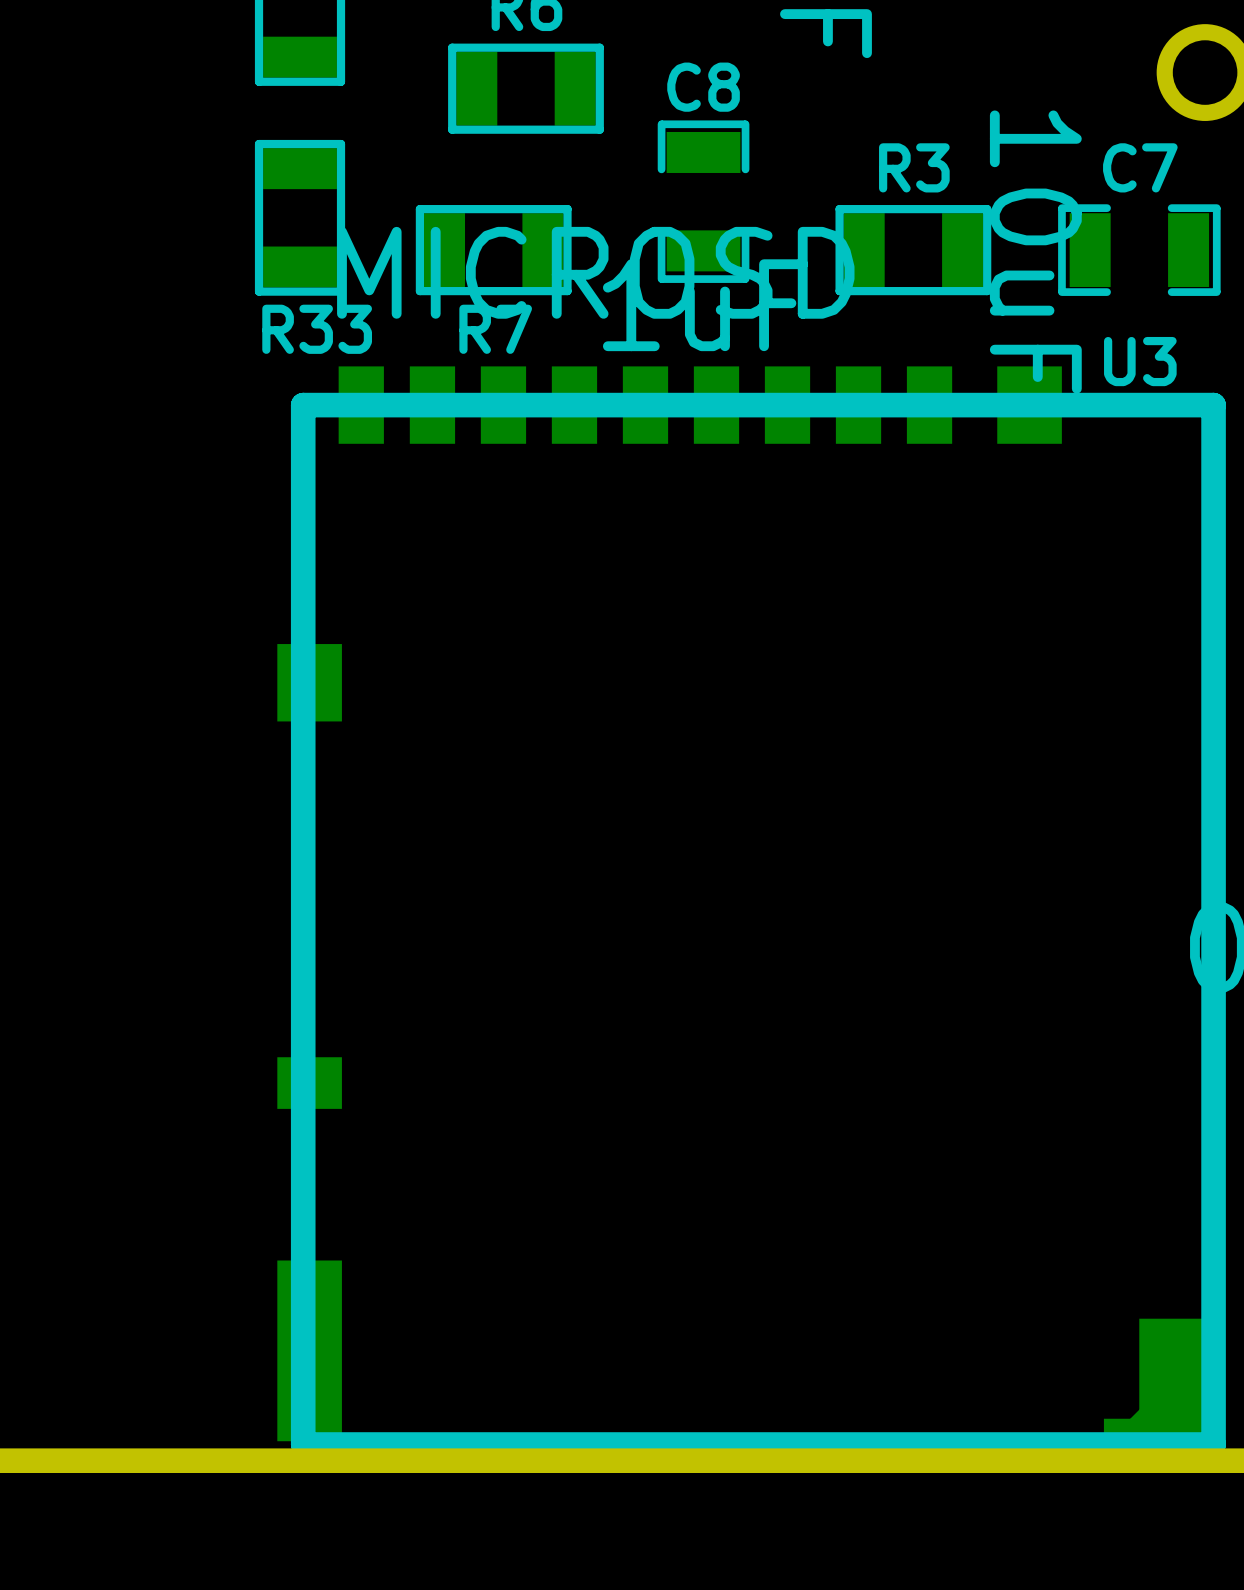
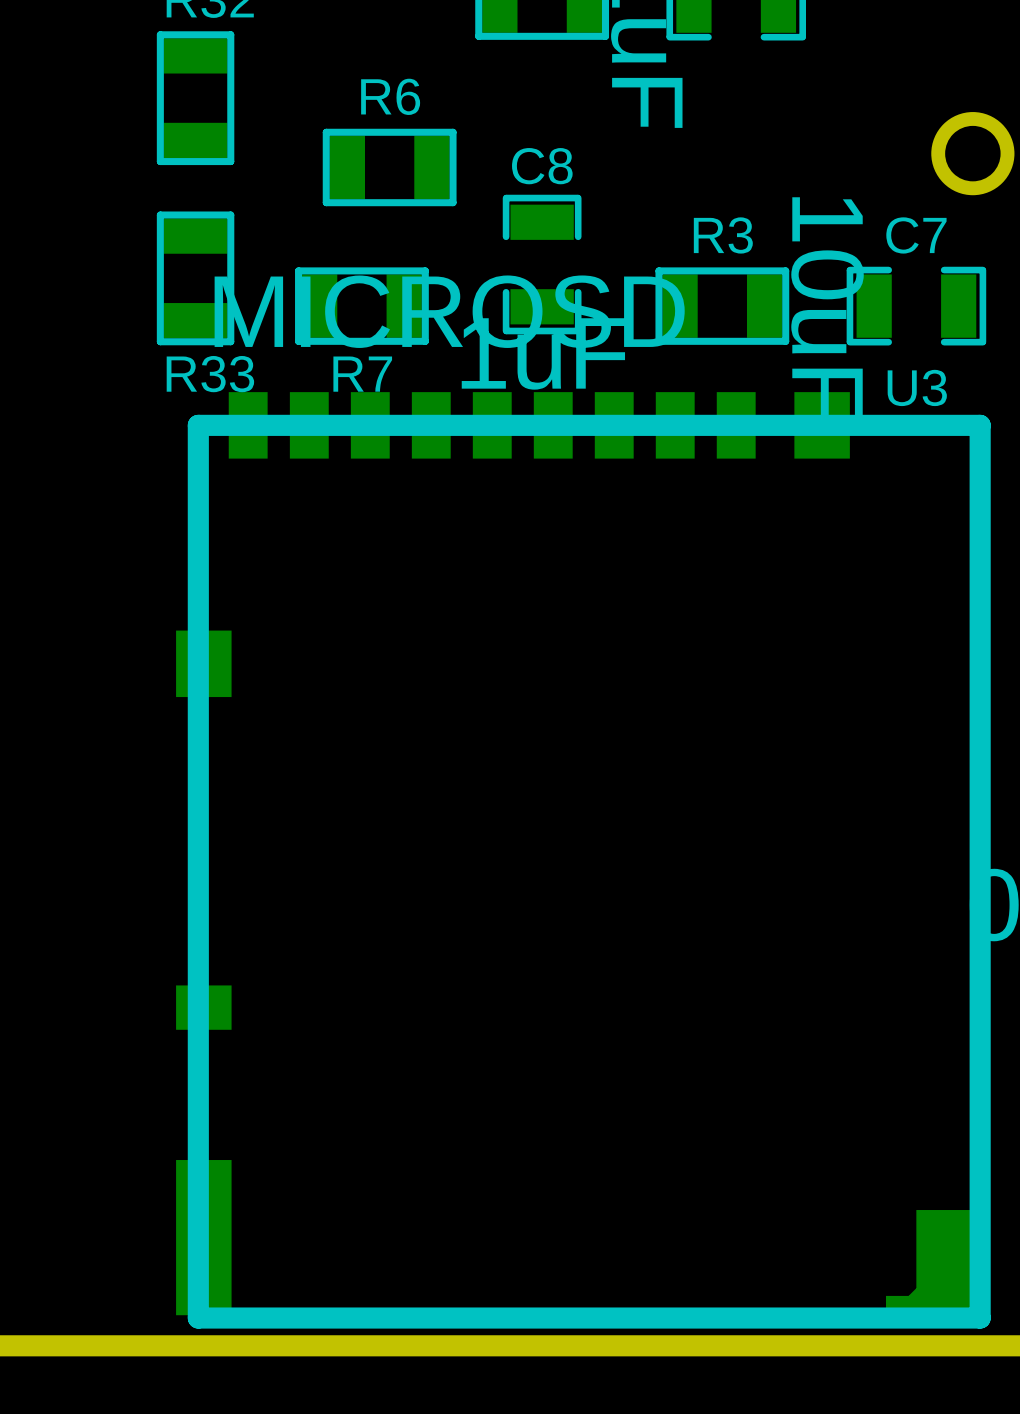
U3 position: (751, 911) -> (583, 860)

